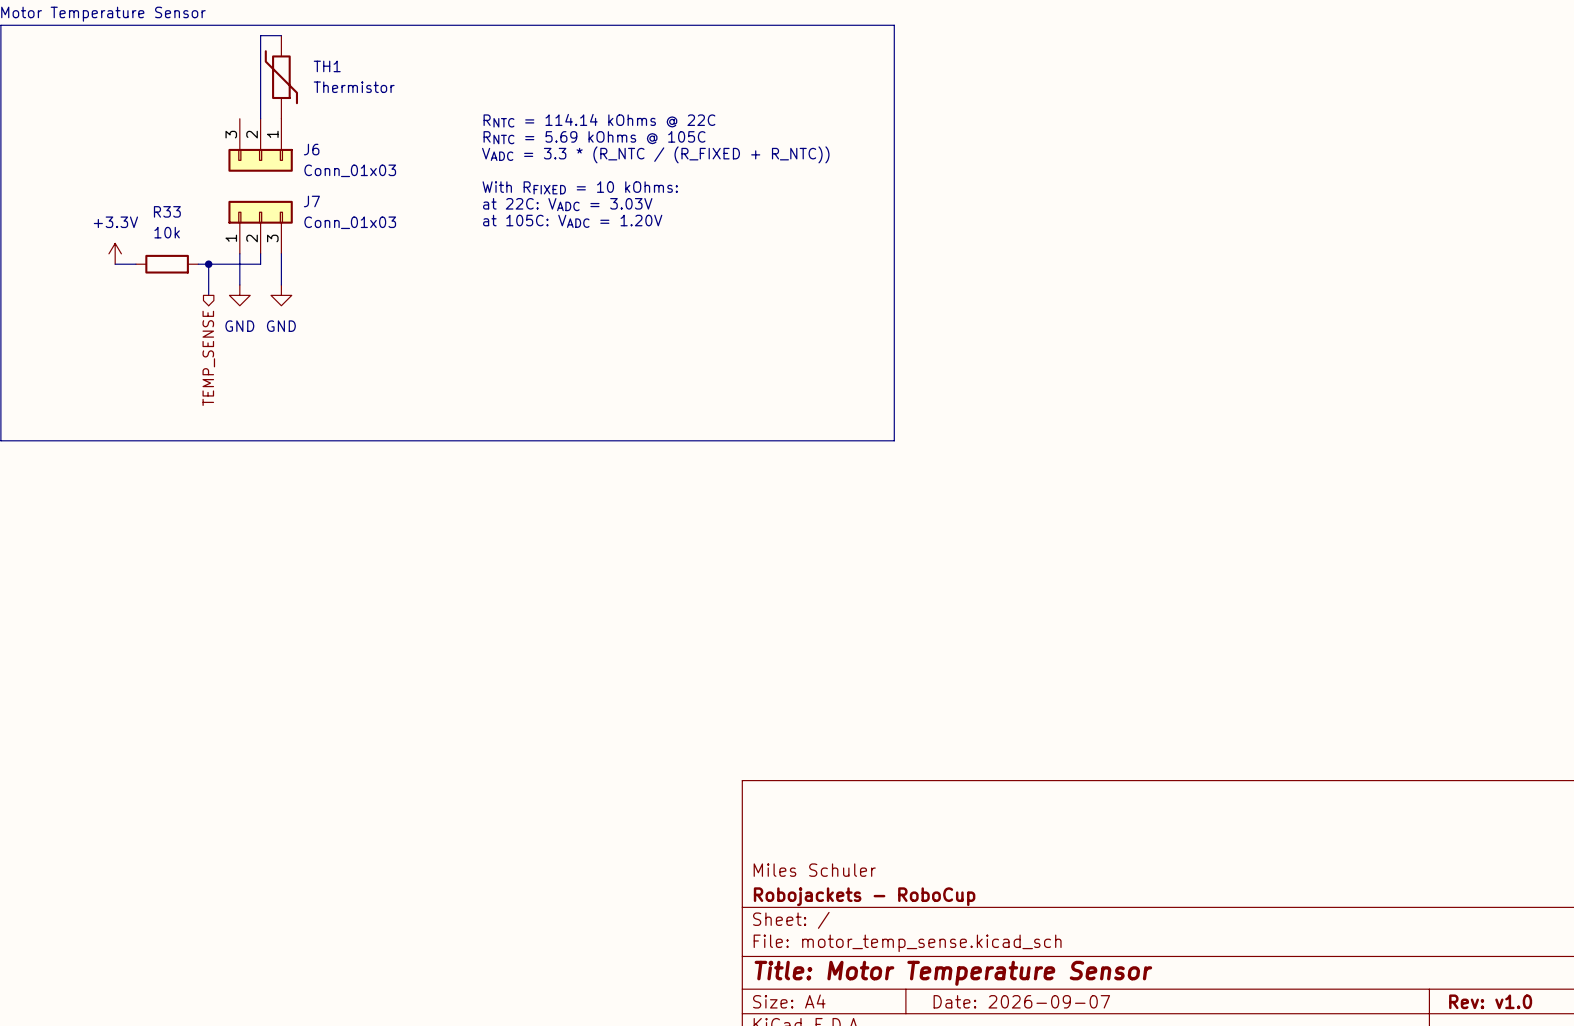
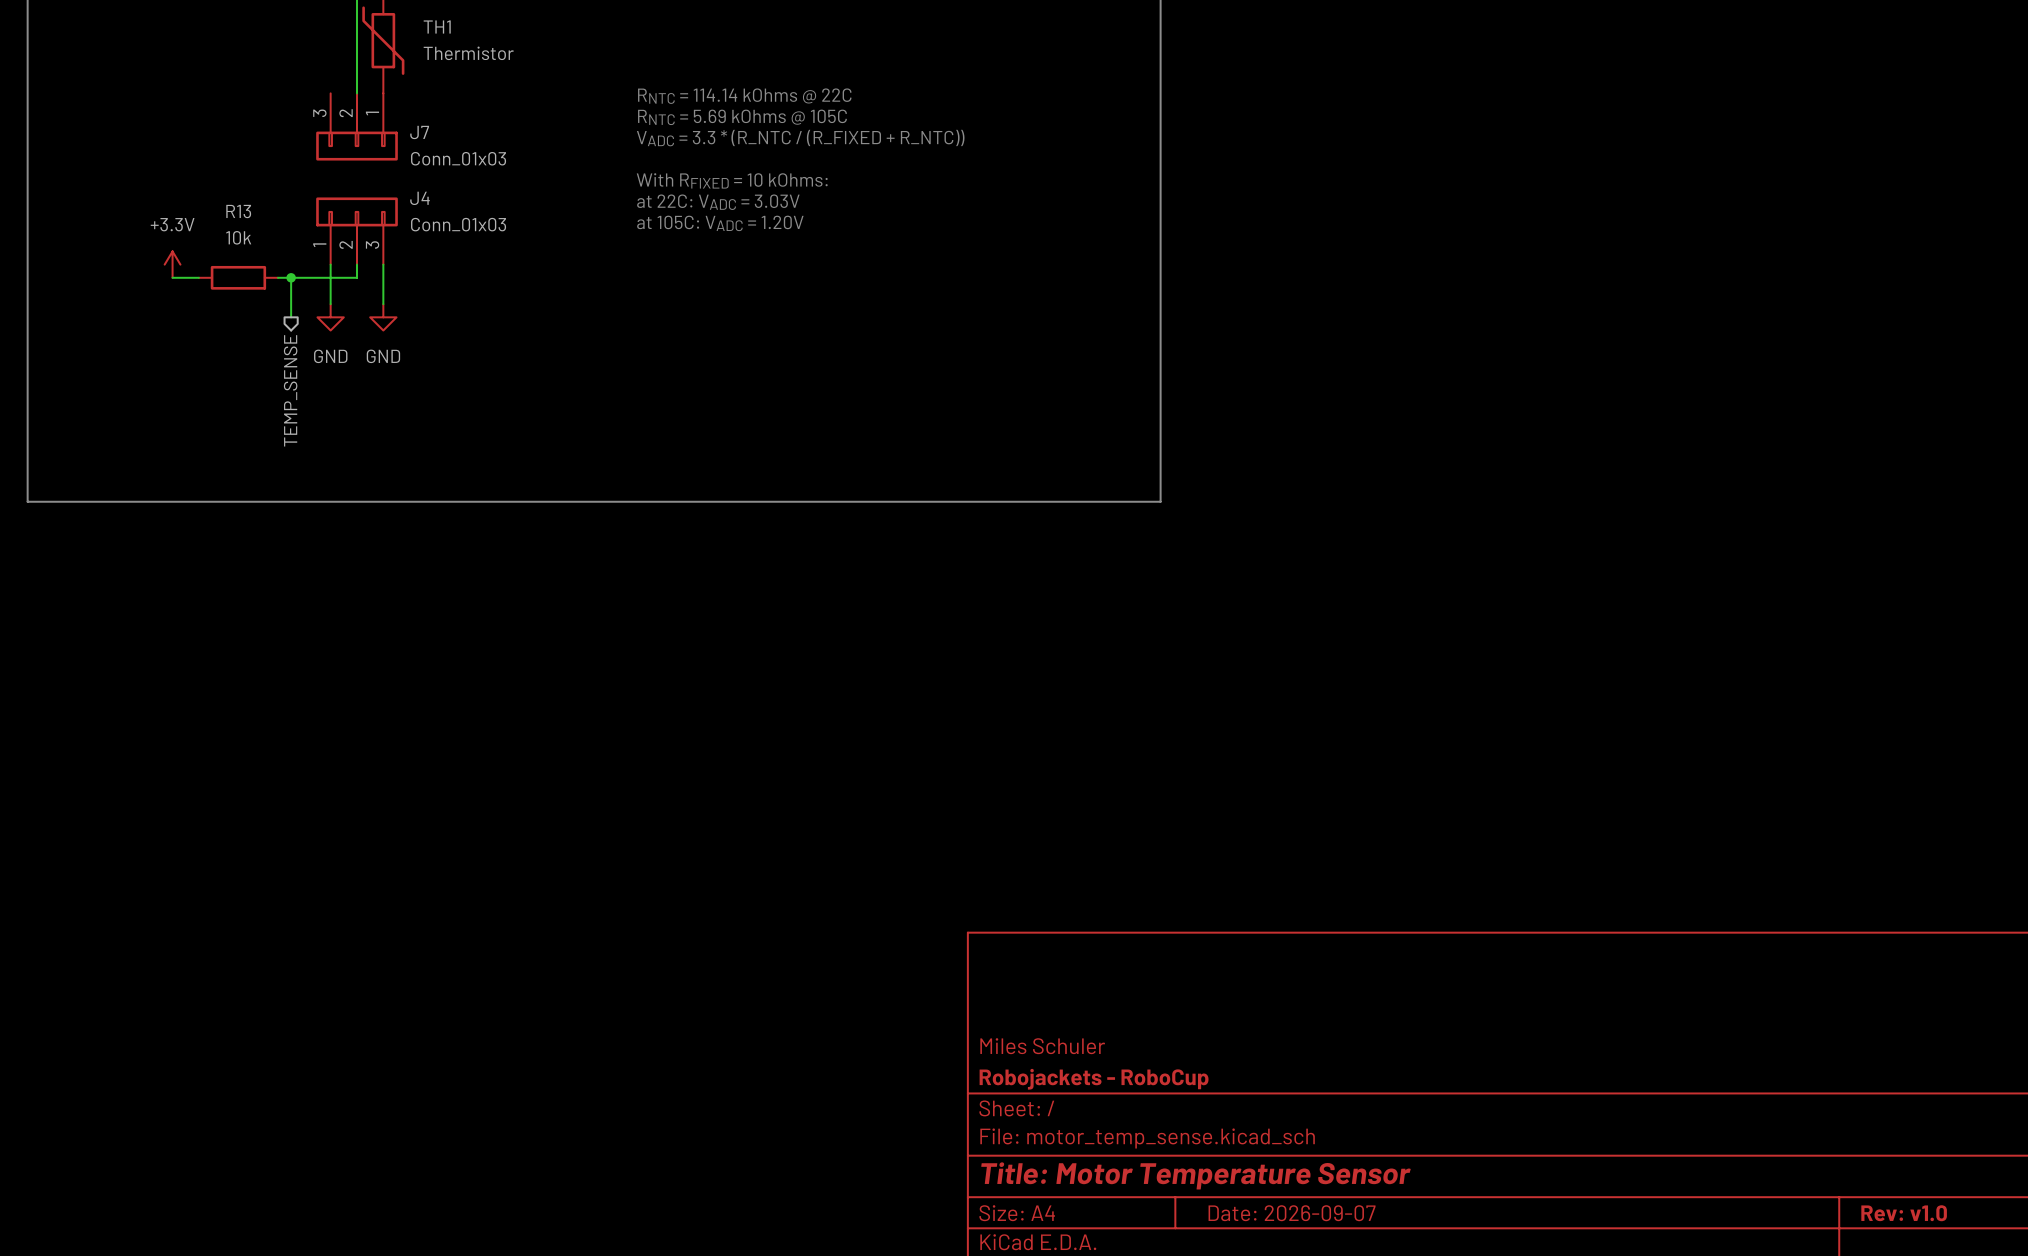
J6 name: J6 (311, 149) -> J7 (419, 132)
J7 name: J7 (311, 201) -> J4 (420, 198)
R33 name: R33 (167, 211) -> R13 (238, 211)

